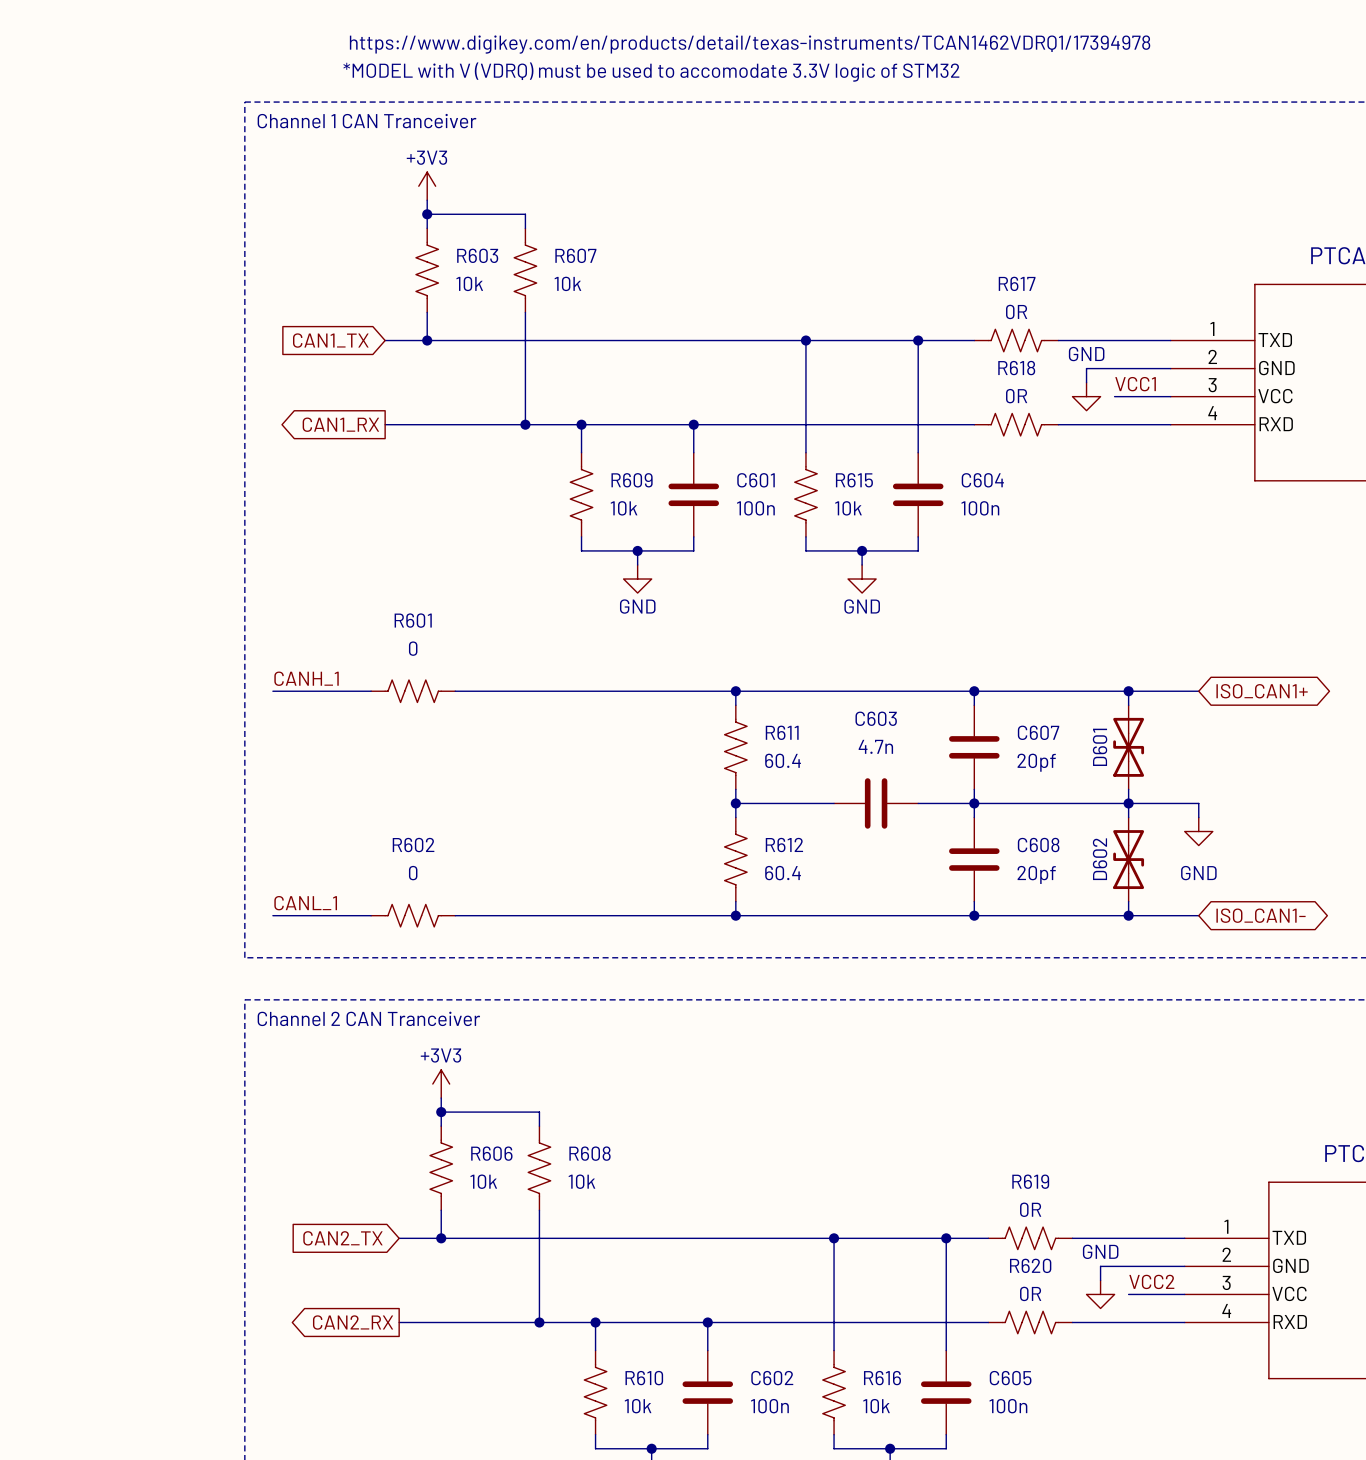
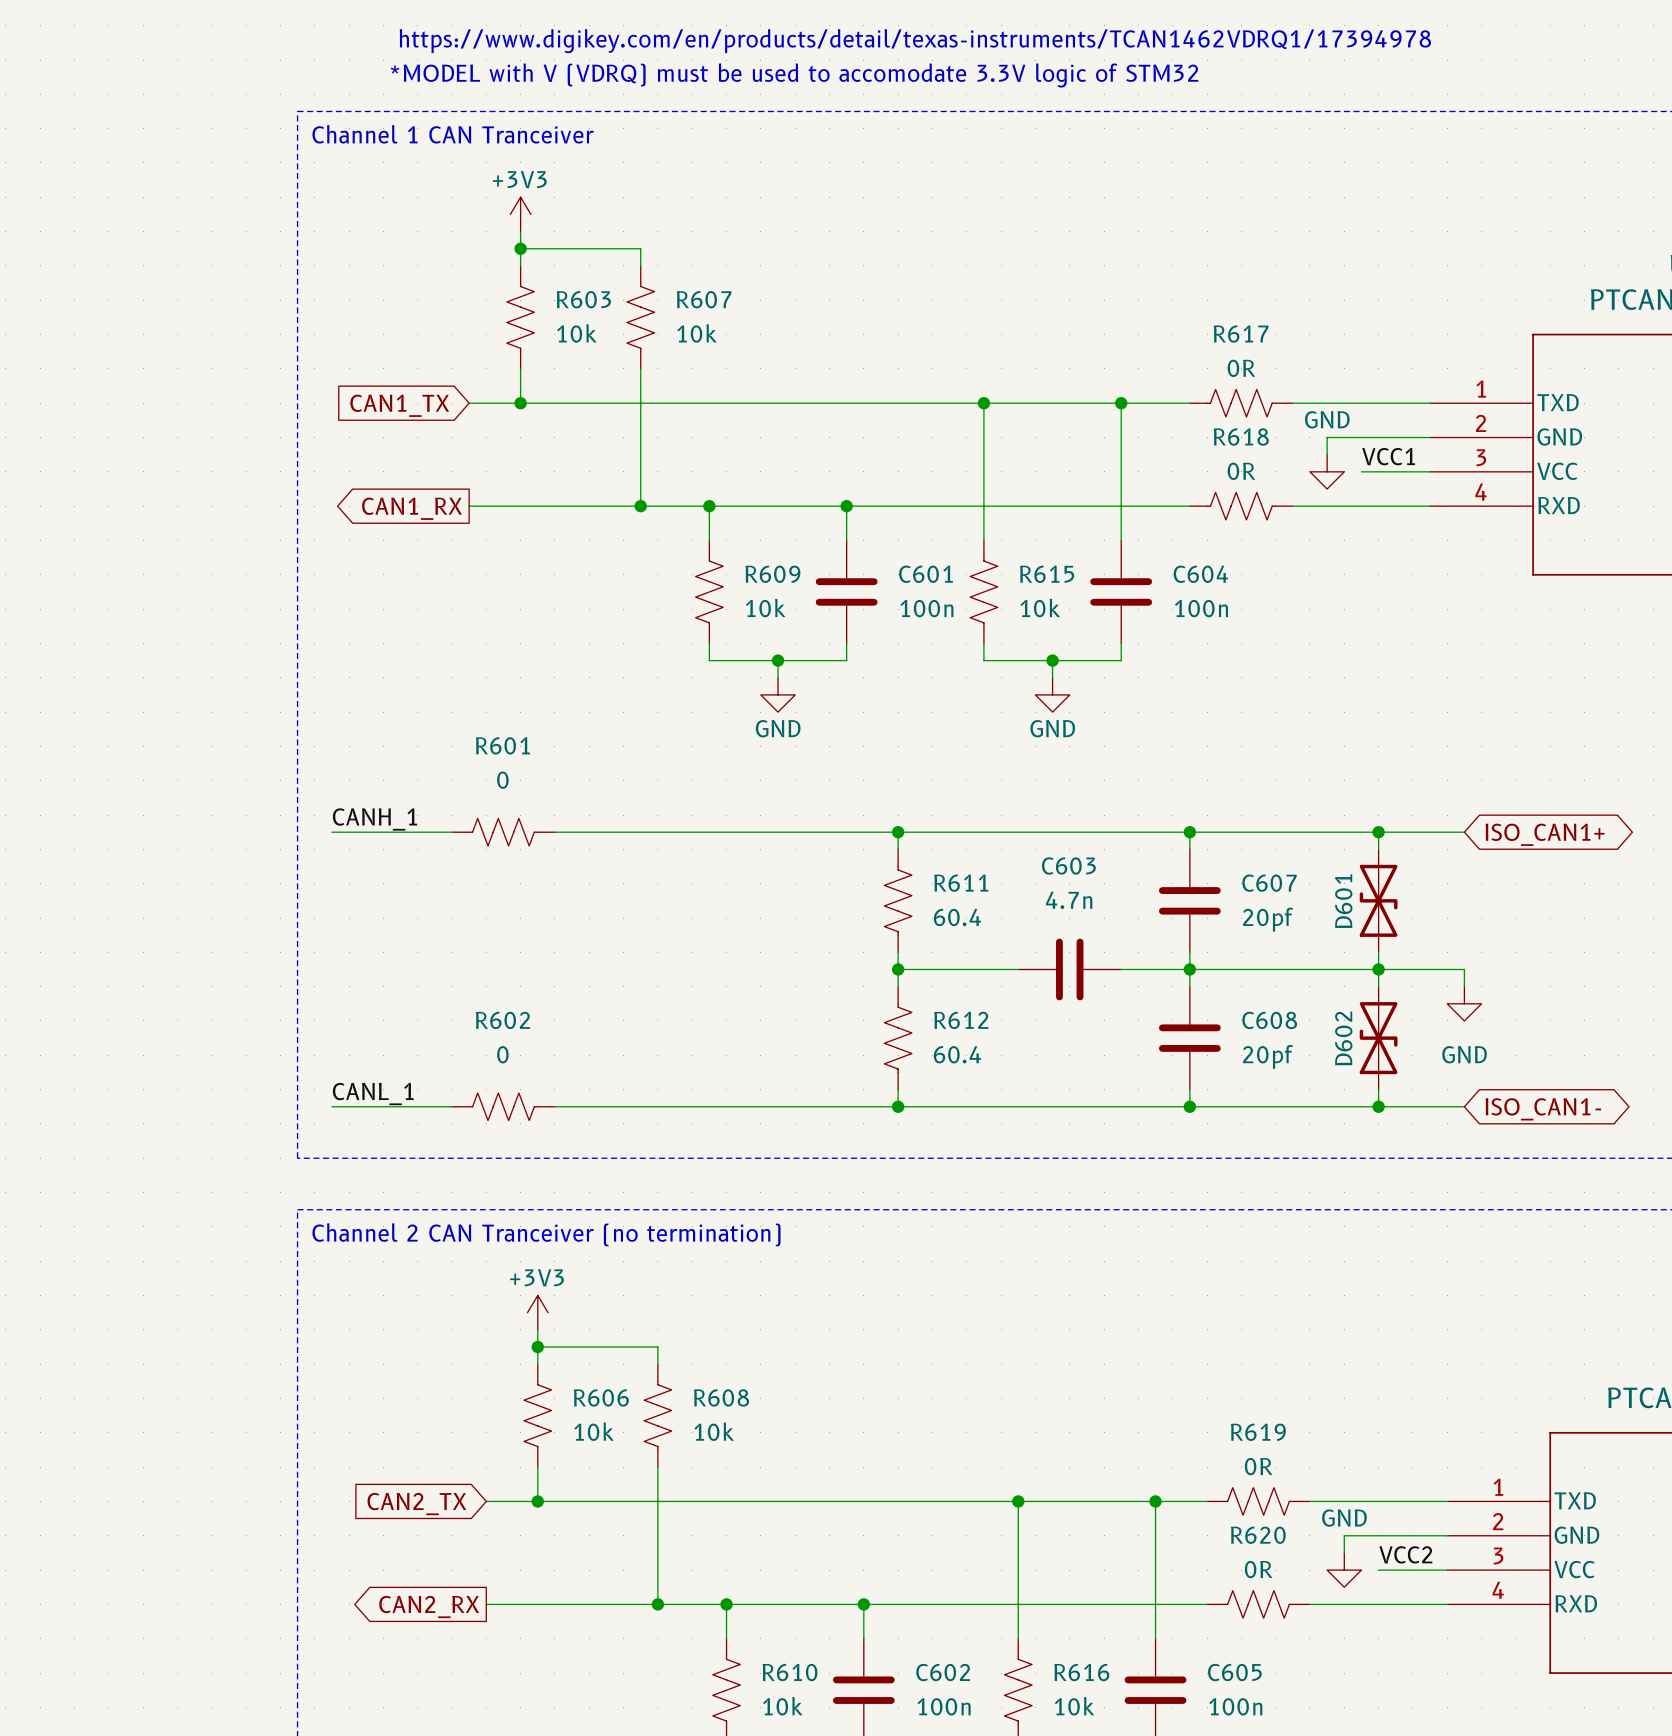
text: Channel 2 CAN Tranceiver (368, 1018) -> Channel 2 CAN Tranceiver (no termination) (546, 1234)

